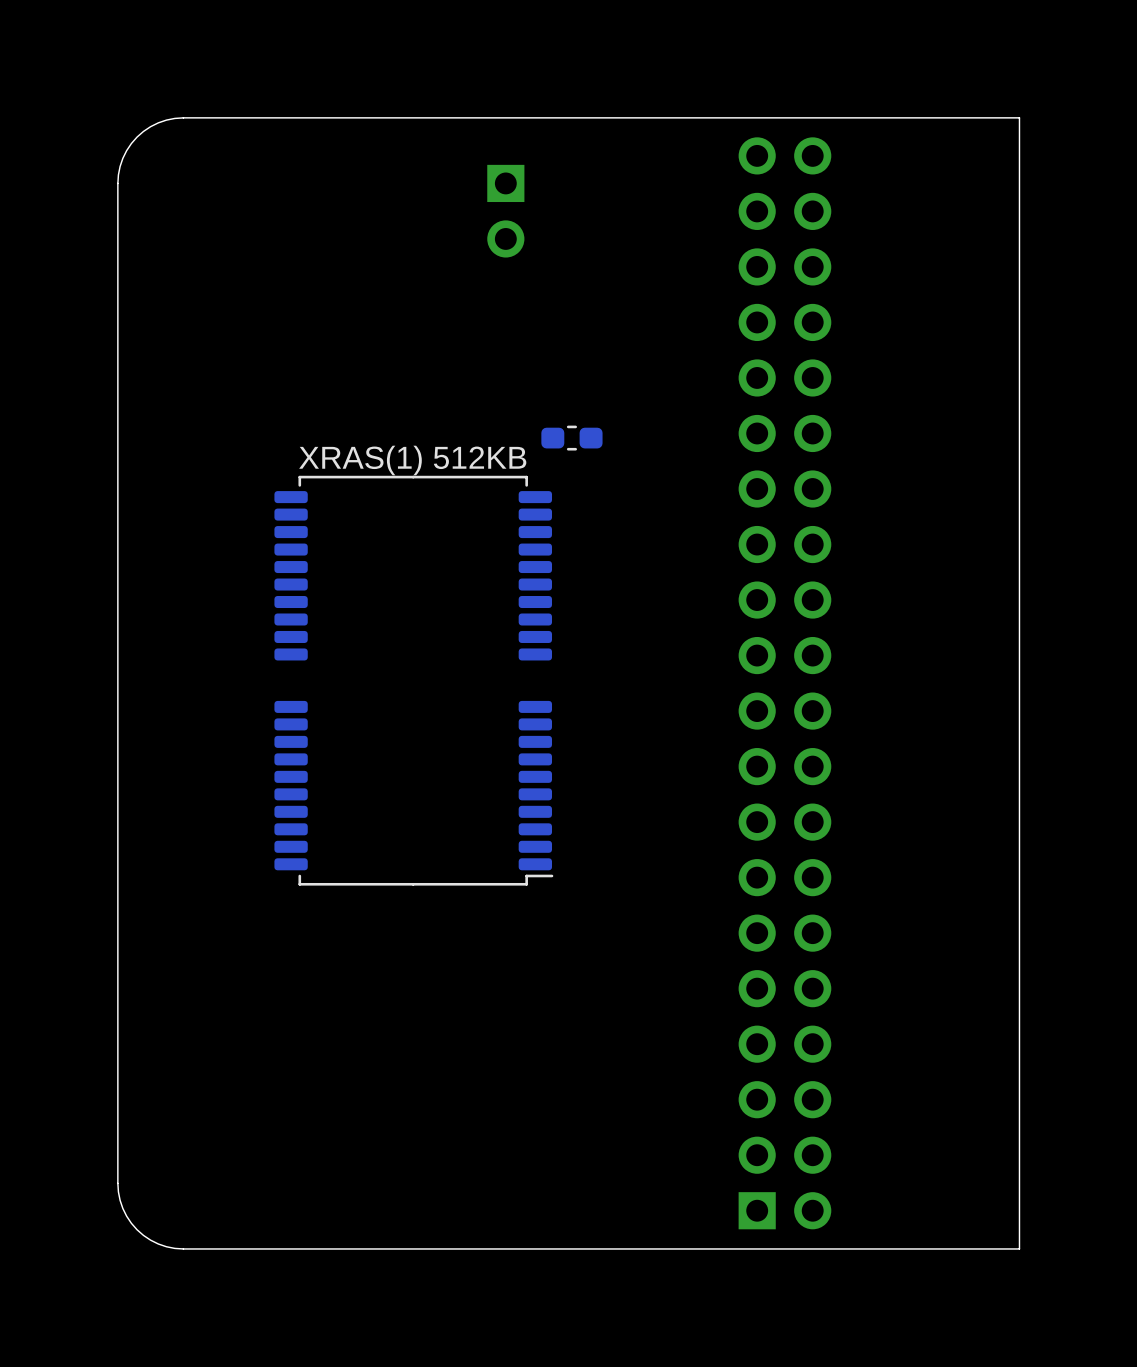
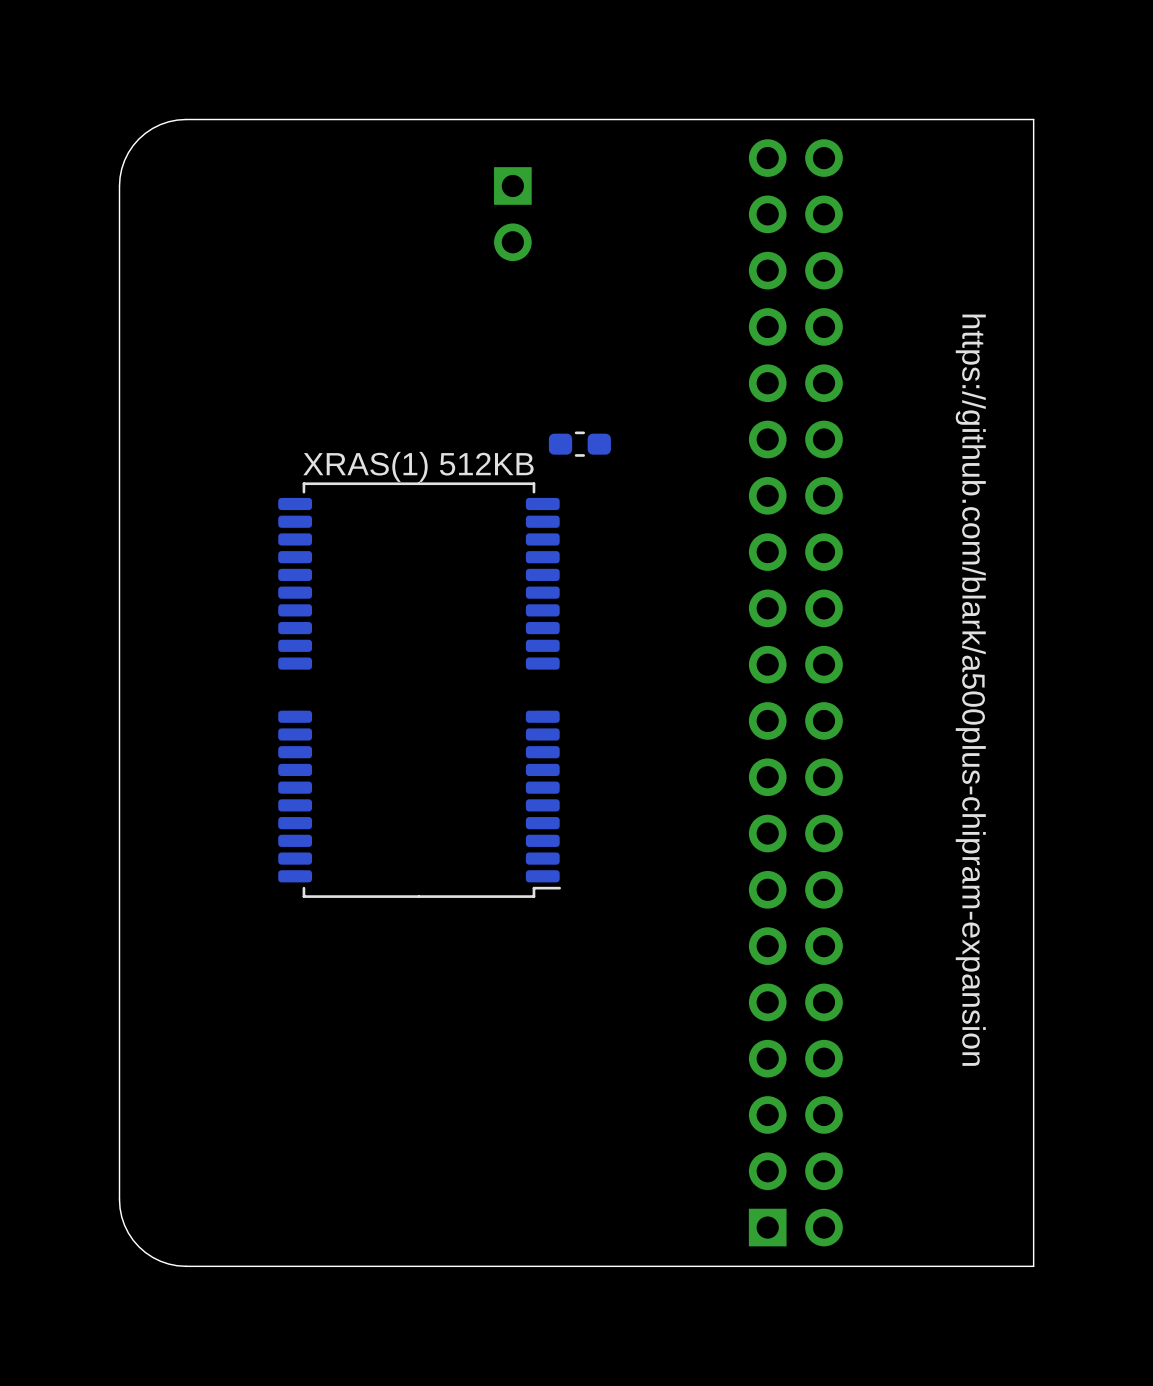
text: none -> https://github.com/blark/a500plus-chipram-expansion (970, 690)

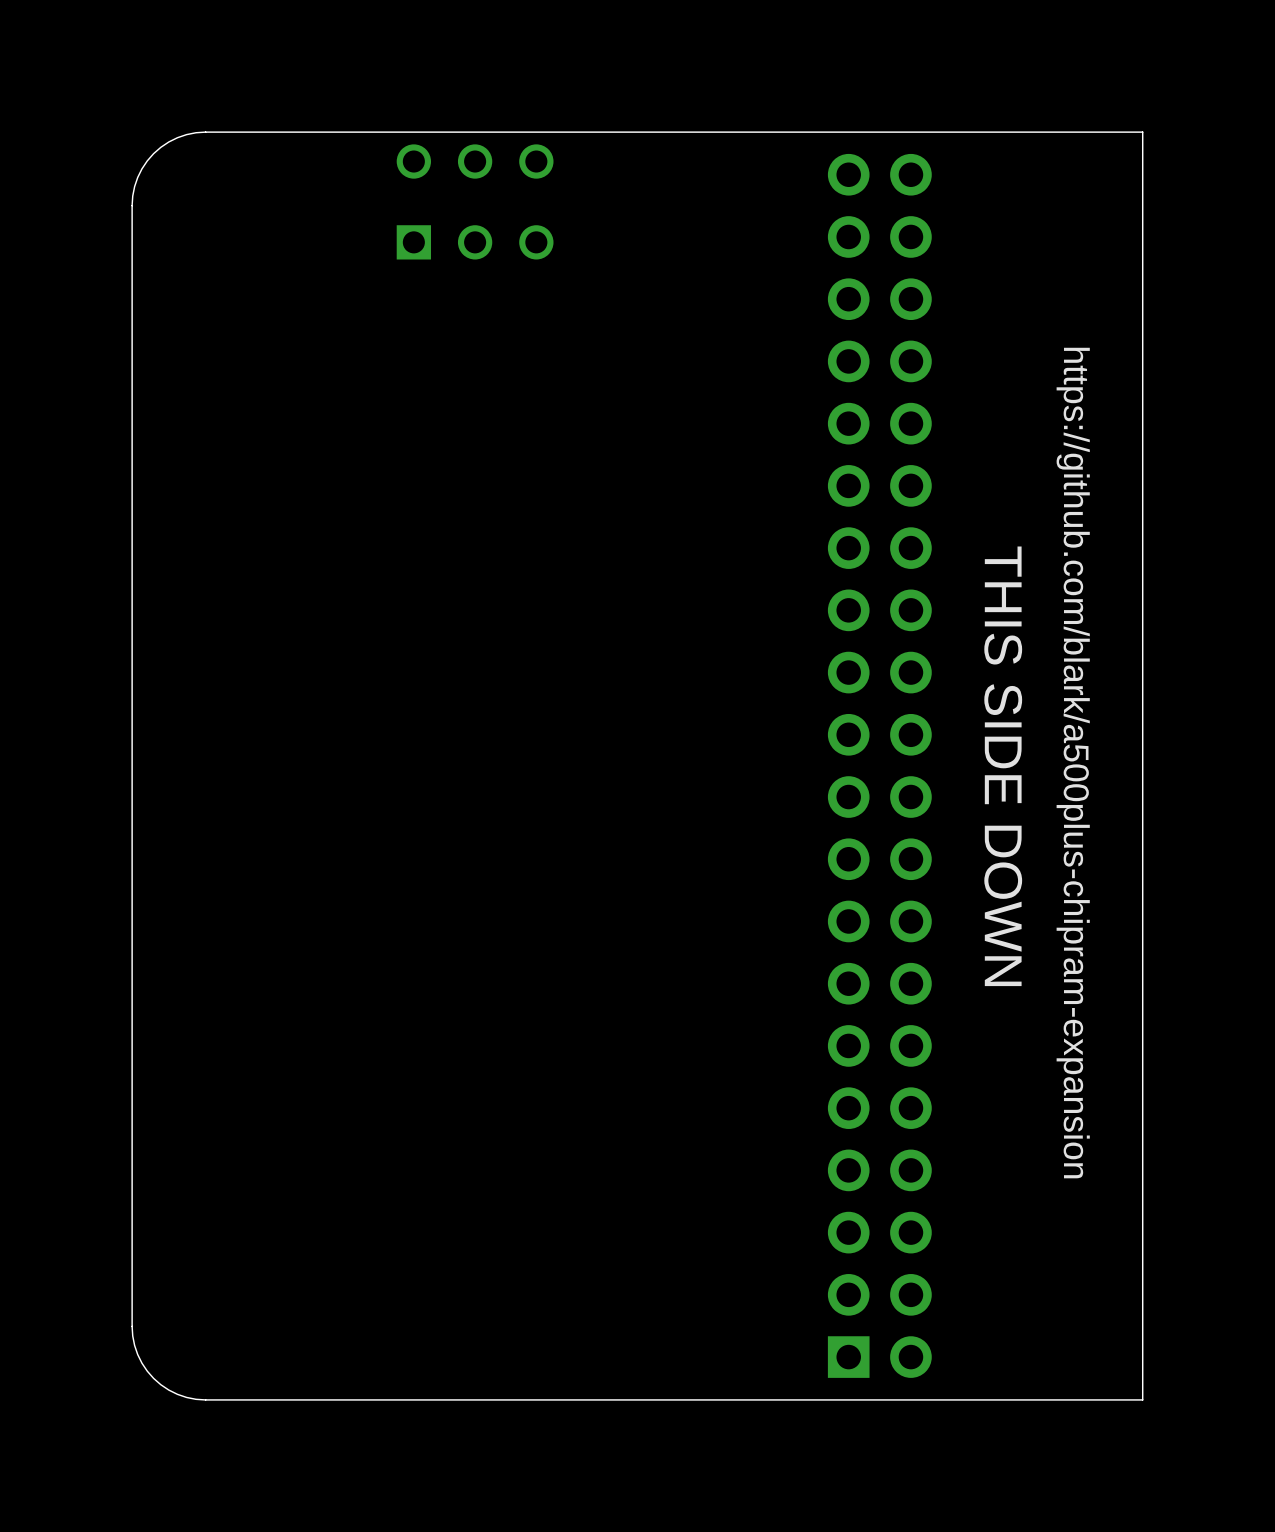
part: none -> (475, 201)
part: (512, 214) -> none
part: (579, 444) -> none
part: XRAS(1) 512KB (419, 690) -> none
text: none -> THIS SIDE DOWN (1003, 766)

